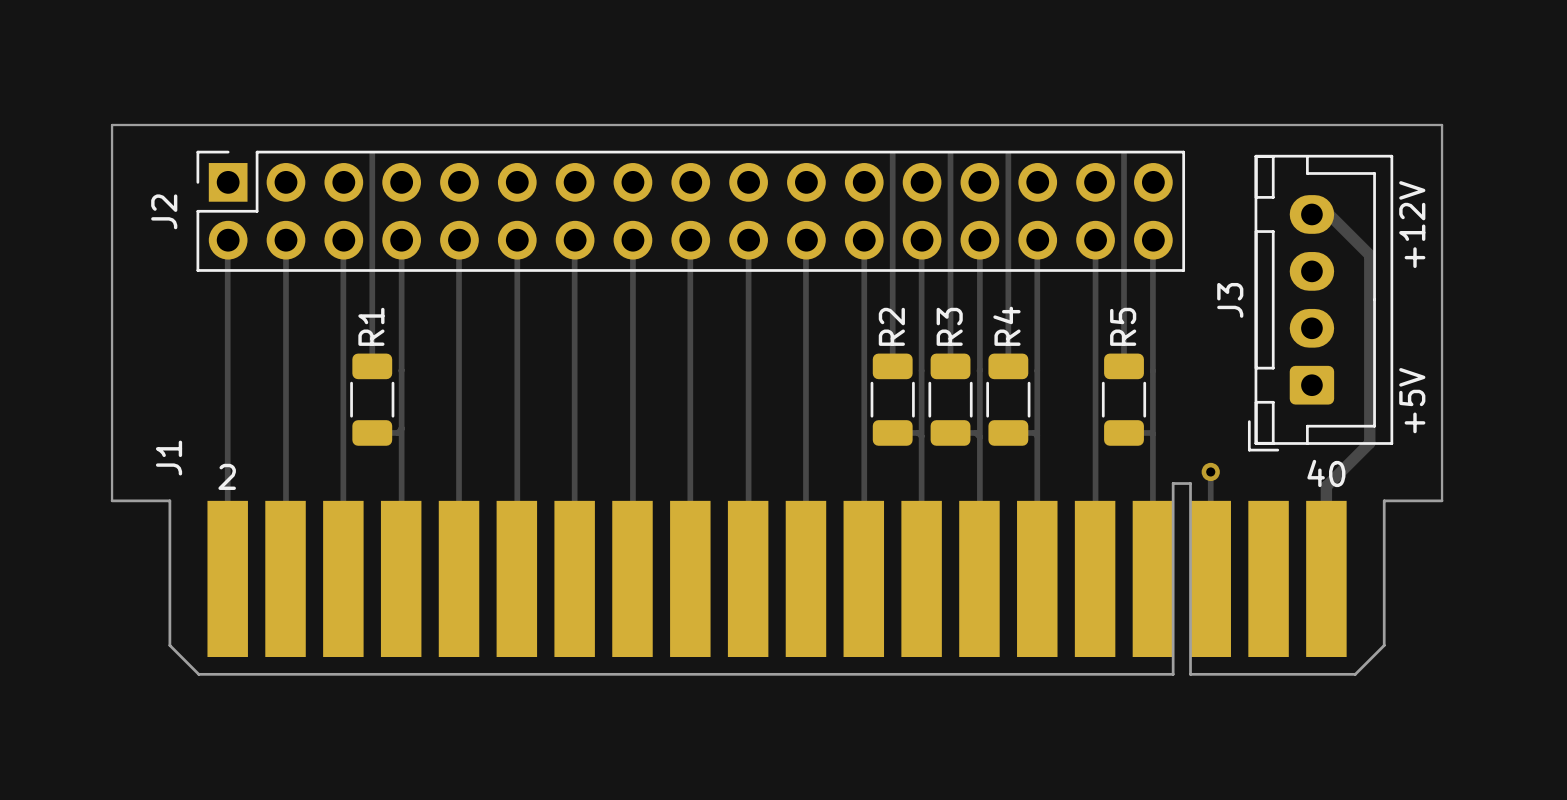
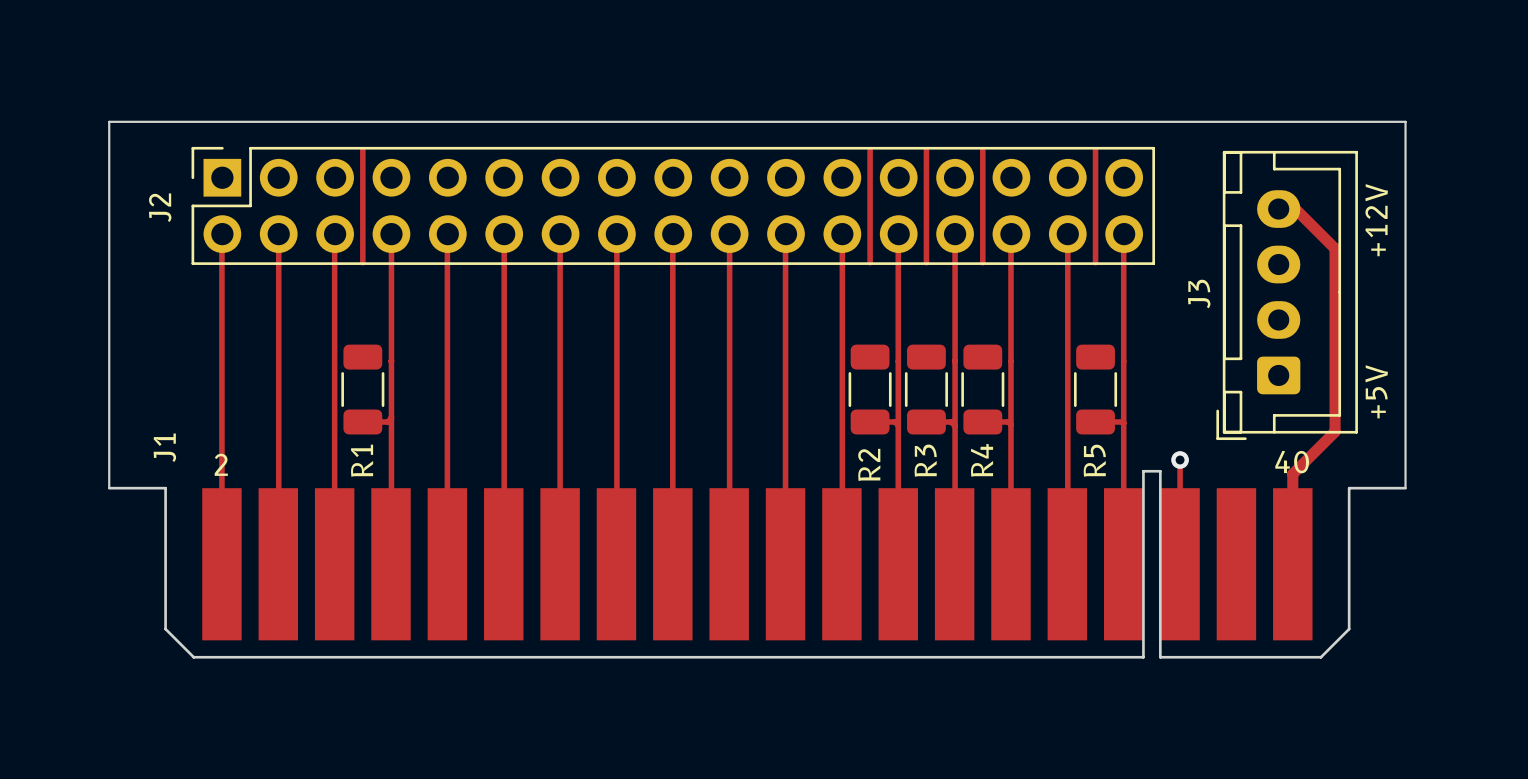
track: (372, 269) (372, 361) -> none
track: (892, 269) (892, 366) -> none
track: (950, 269) (950, 366) -> none
track: (1008, 269) (1008, 366) -> none
track: (1124, 269) (1124, 366) -> none
R1 name position: R1 (371, 326) -> R1 (362, 460)
R2 name position: R2 (891, 326) -> R2 (869, 464)
R3 name position: R3 (949, 326) -> R3 (925, 460)
R4 name position: R4 (1006, 326) -> R4 (981, 460)
R5 name position: R5 (1123, 326) -> R5 (1094, 460)

